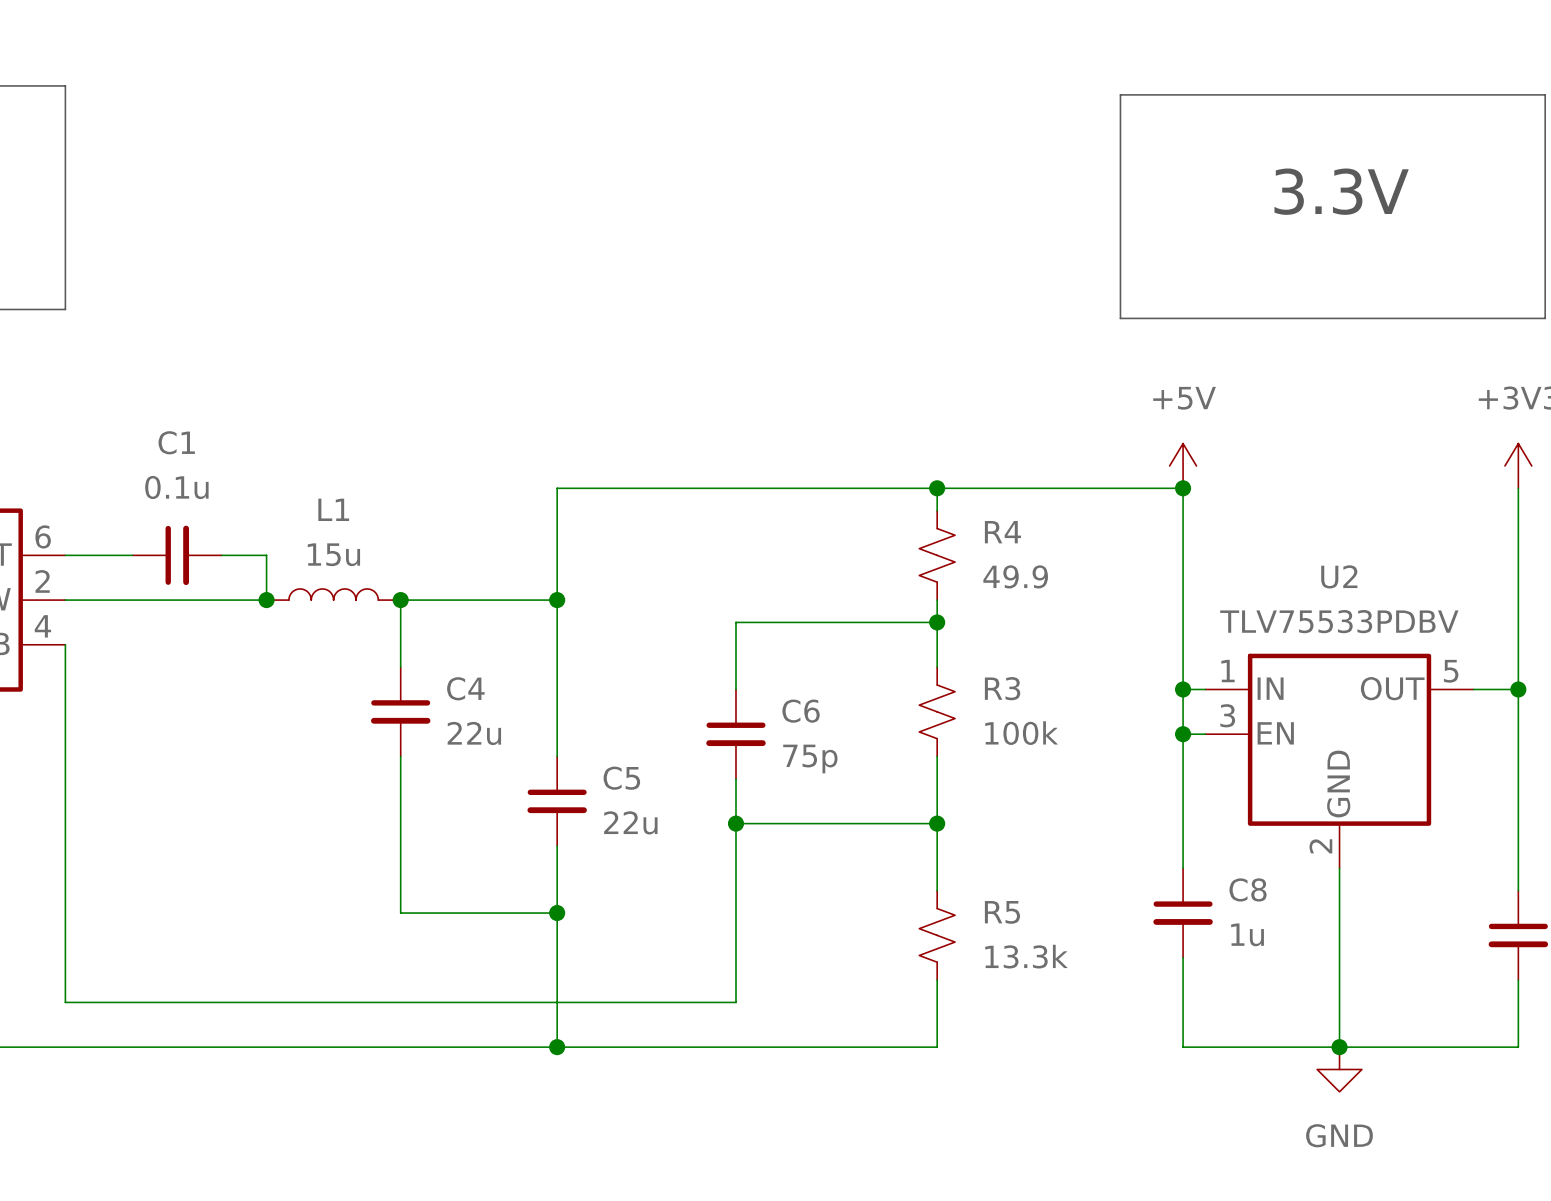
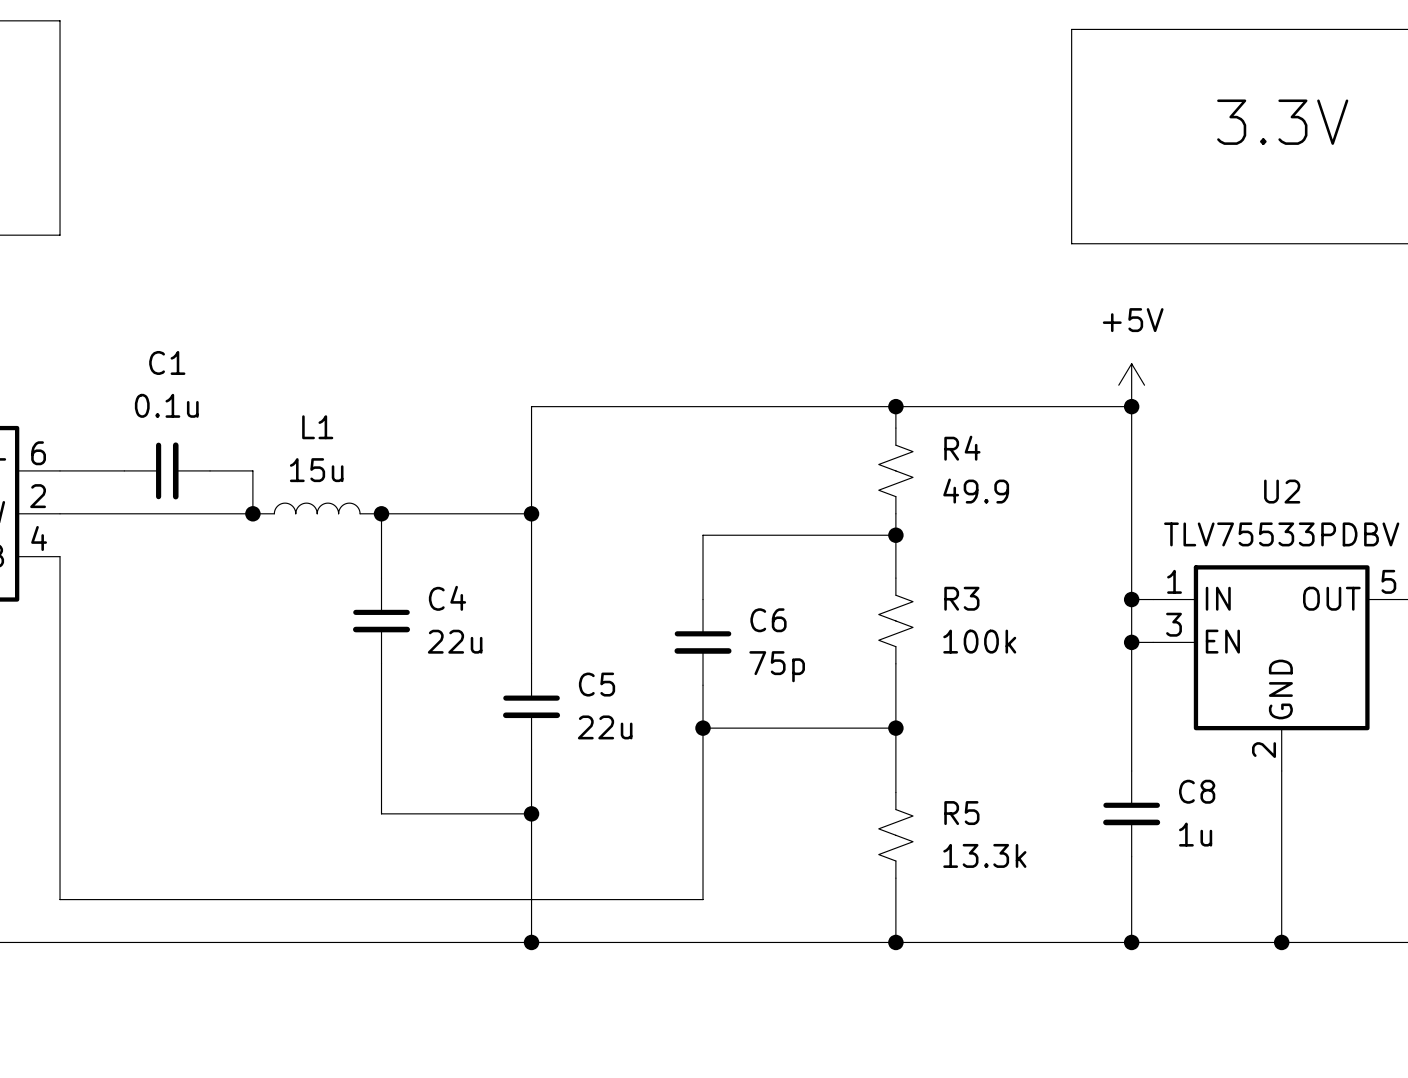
wire: none -> (895, 942) (1131, 942)
junction: none -> (895, 942)
junction: none -> (1131, 942)
power symbol: GND (1339, 1069) -> none

